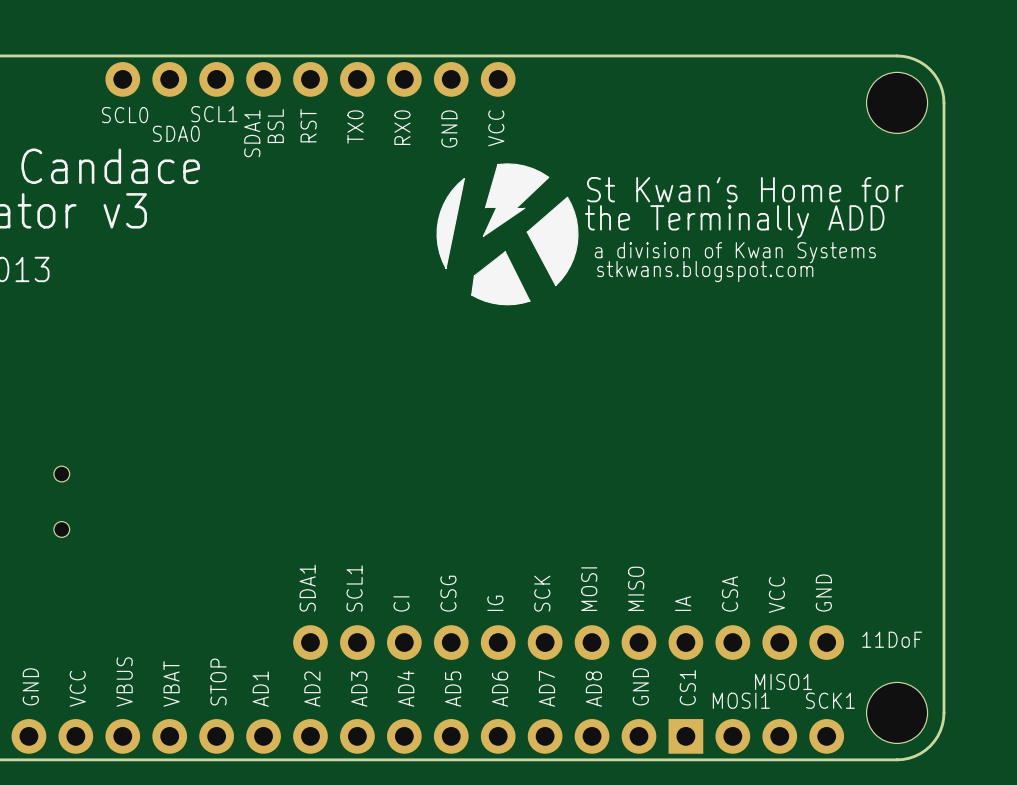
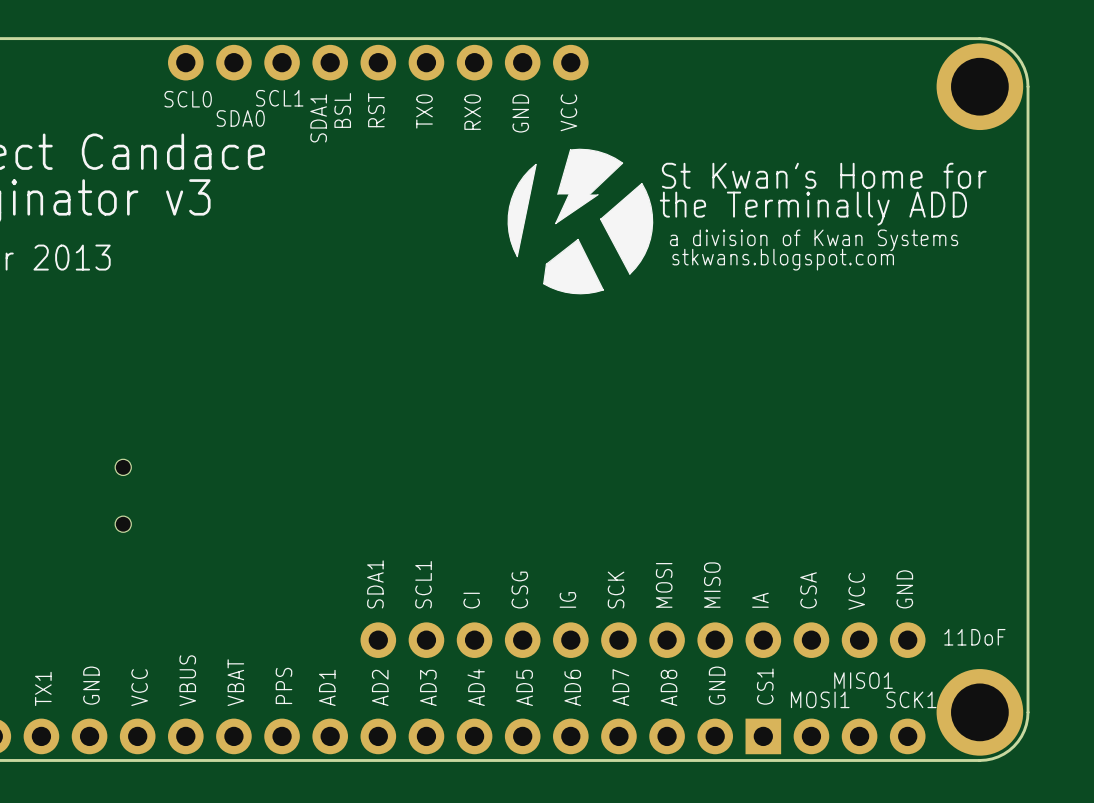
part footprint: [866, 72, 928, 134] -> [936, 43, 1024, 131]
text: STOP (218, 682) -> PPS (283, 685)
part footprint: [866, 682, 928, 744] -> [936, 669, 1024, 756]

